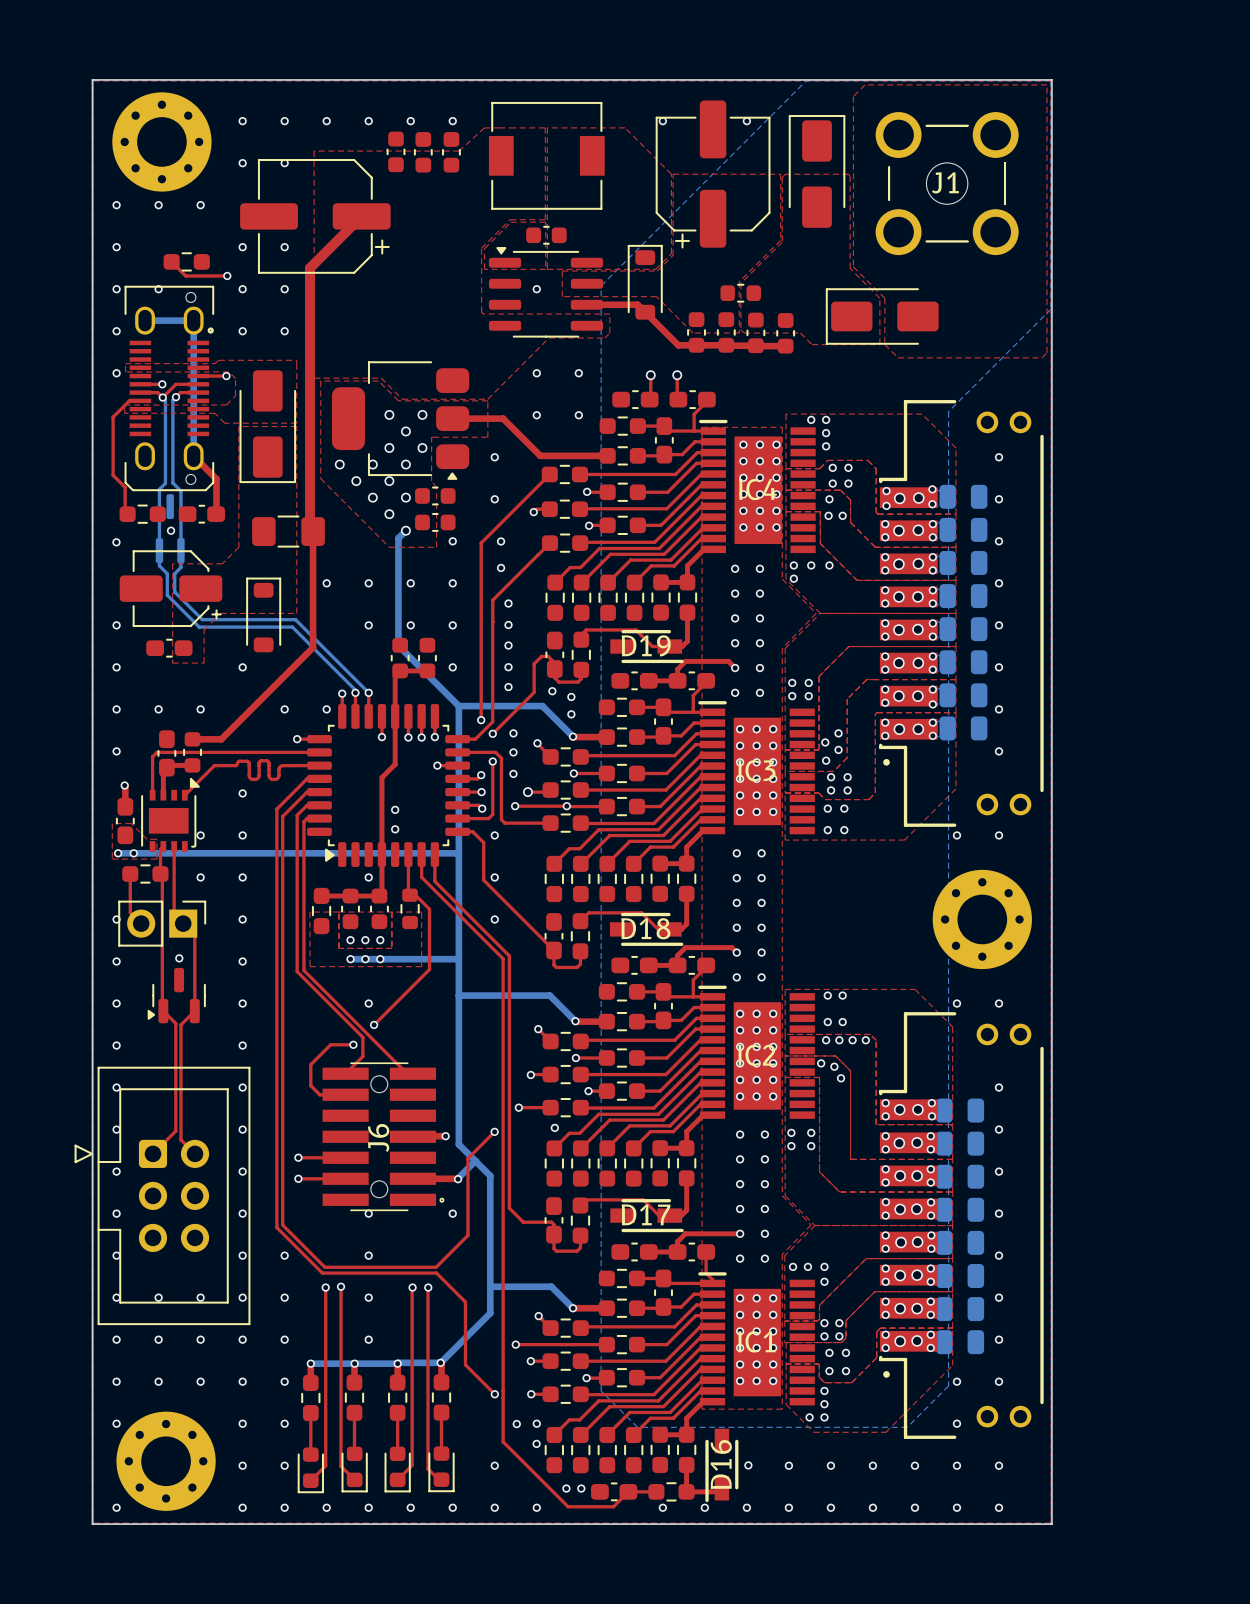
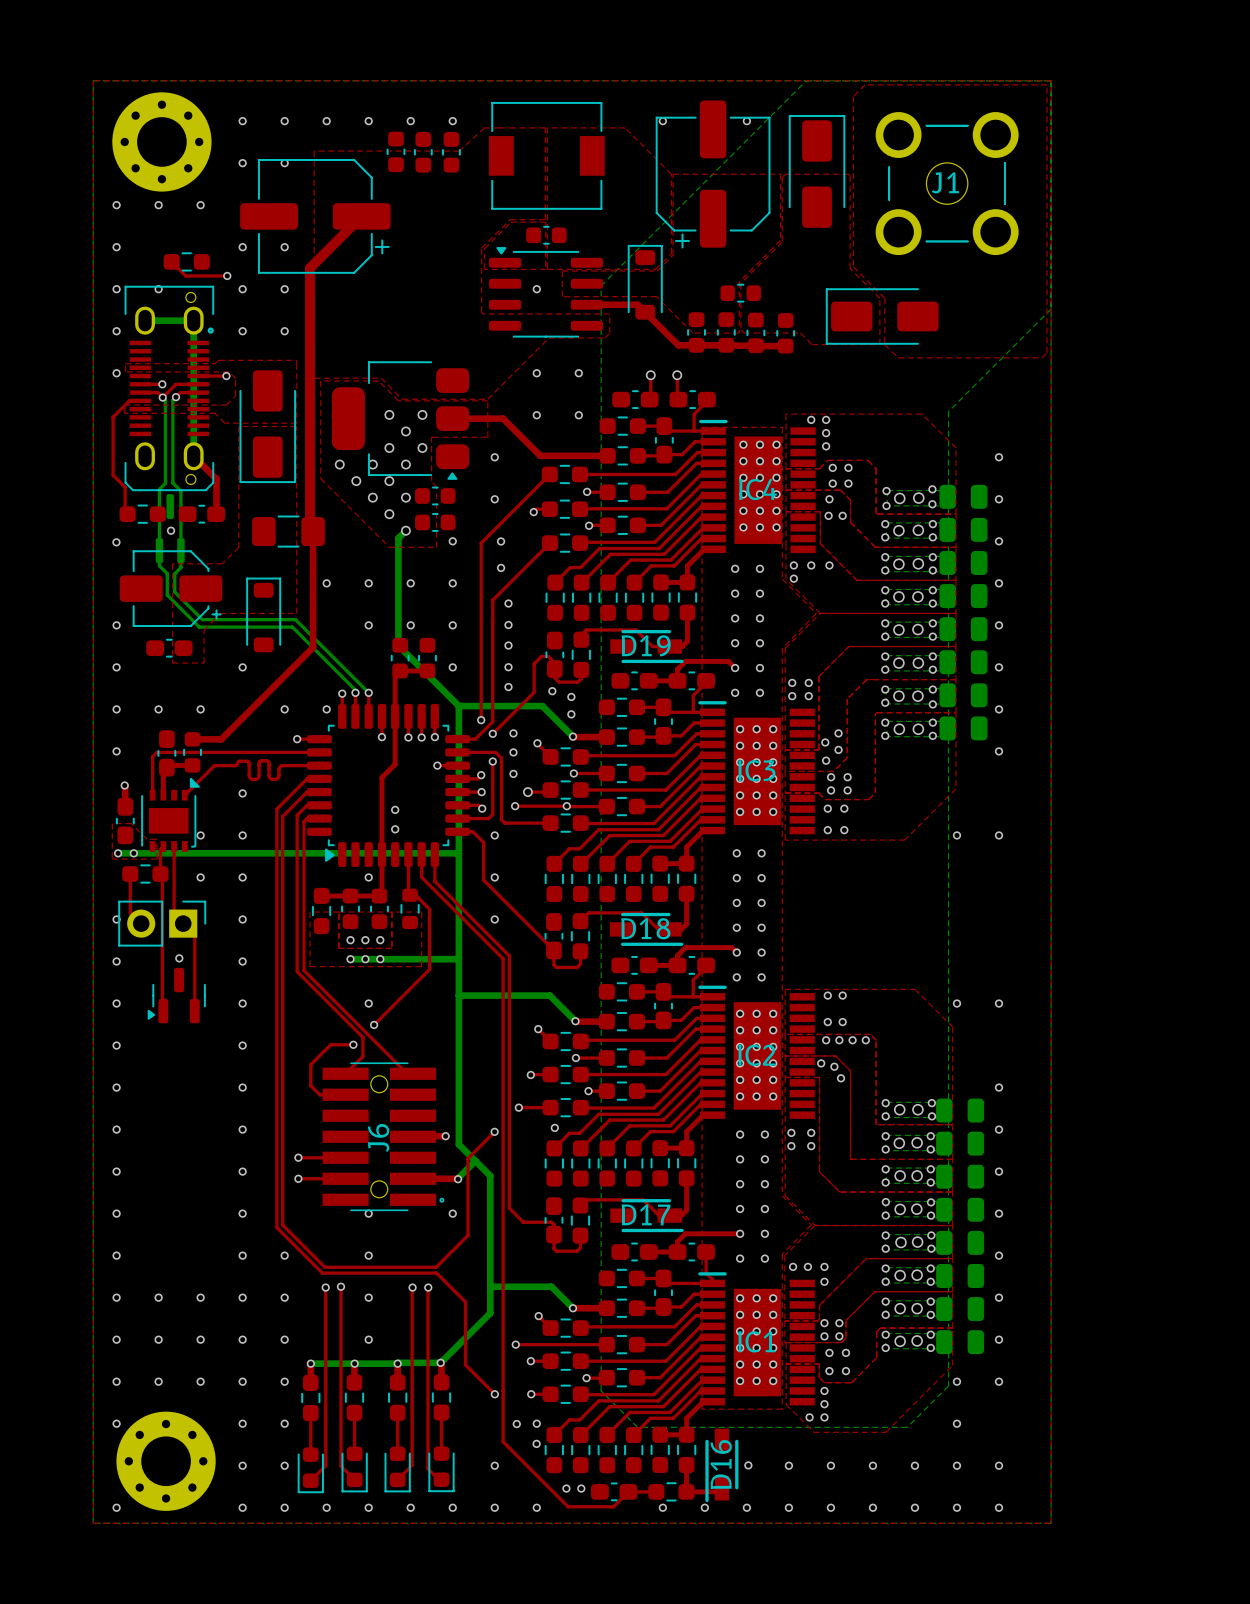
board edge: (92, 79) (1051, 79) (1051, 1524) (92, 1524) (92, 79) -> none
part: (961, 613) -> none
part: (982, 919) -> none
top track: (163, 1011) (175, 1023) (175, 1131) (152, 1153) -> none
top track: (194, 1011) (180, 1024) (180, 1139) (195, 1153) -> none
part: (162, 1195) -> none
part: (961, 1225) -> none

